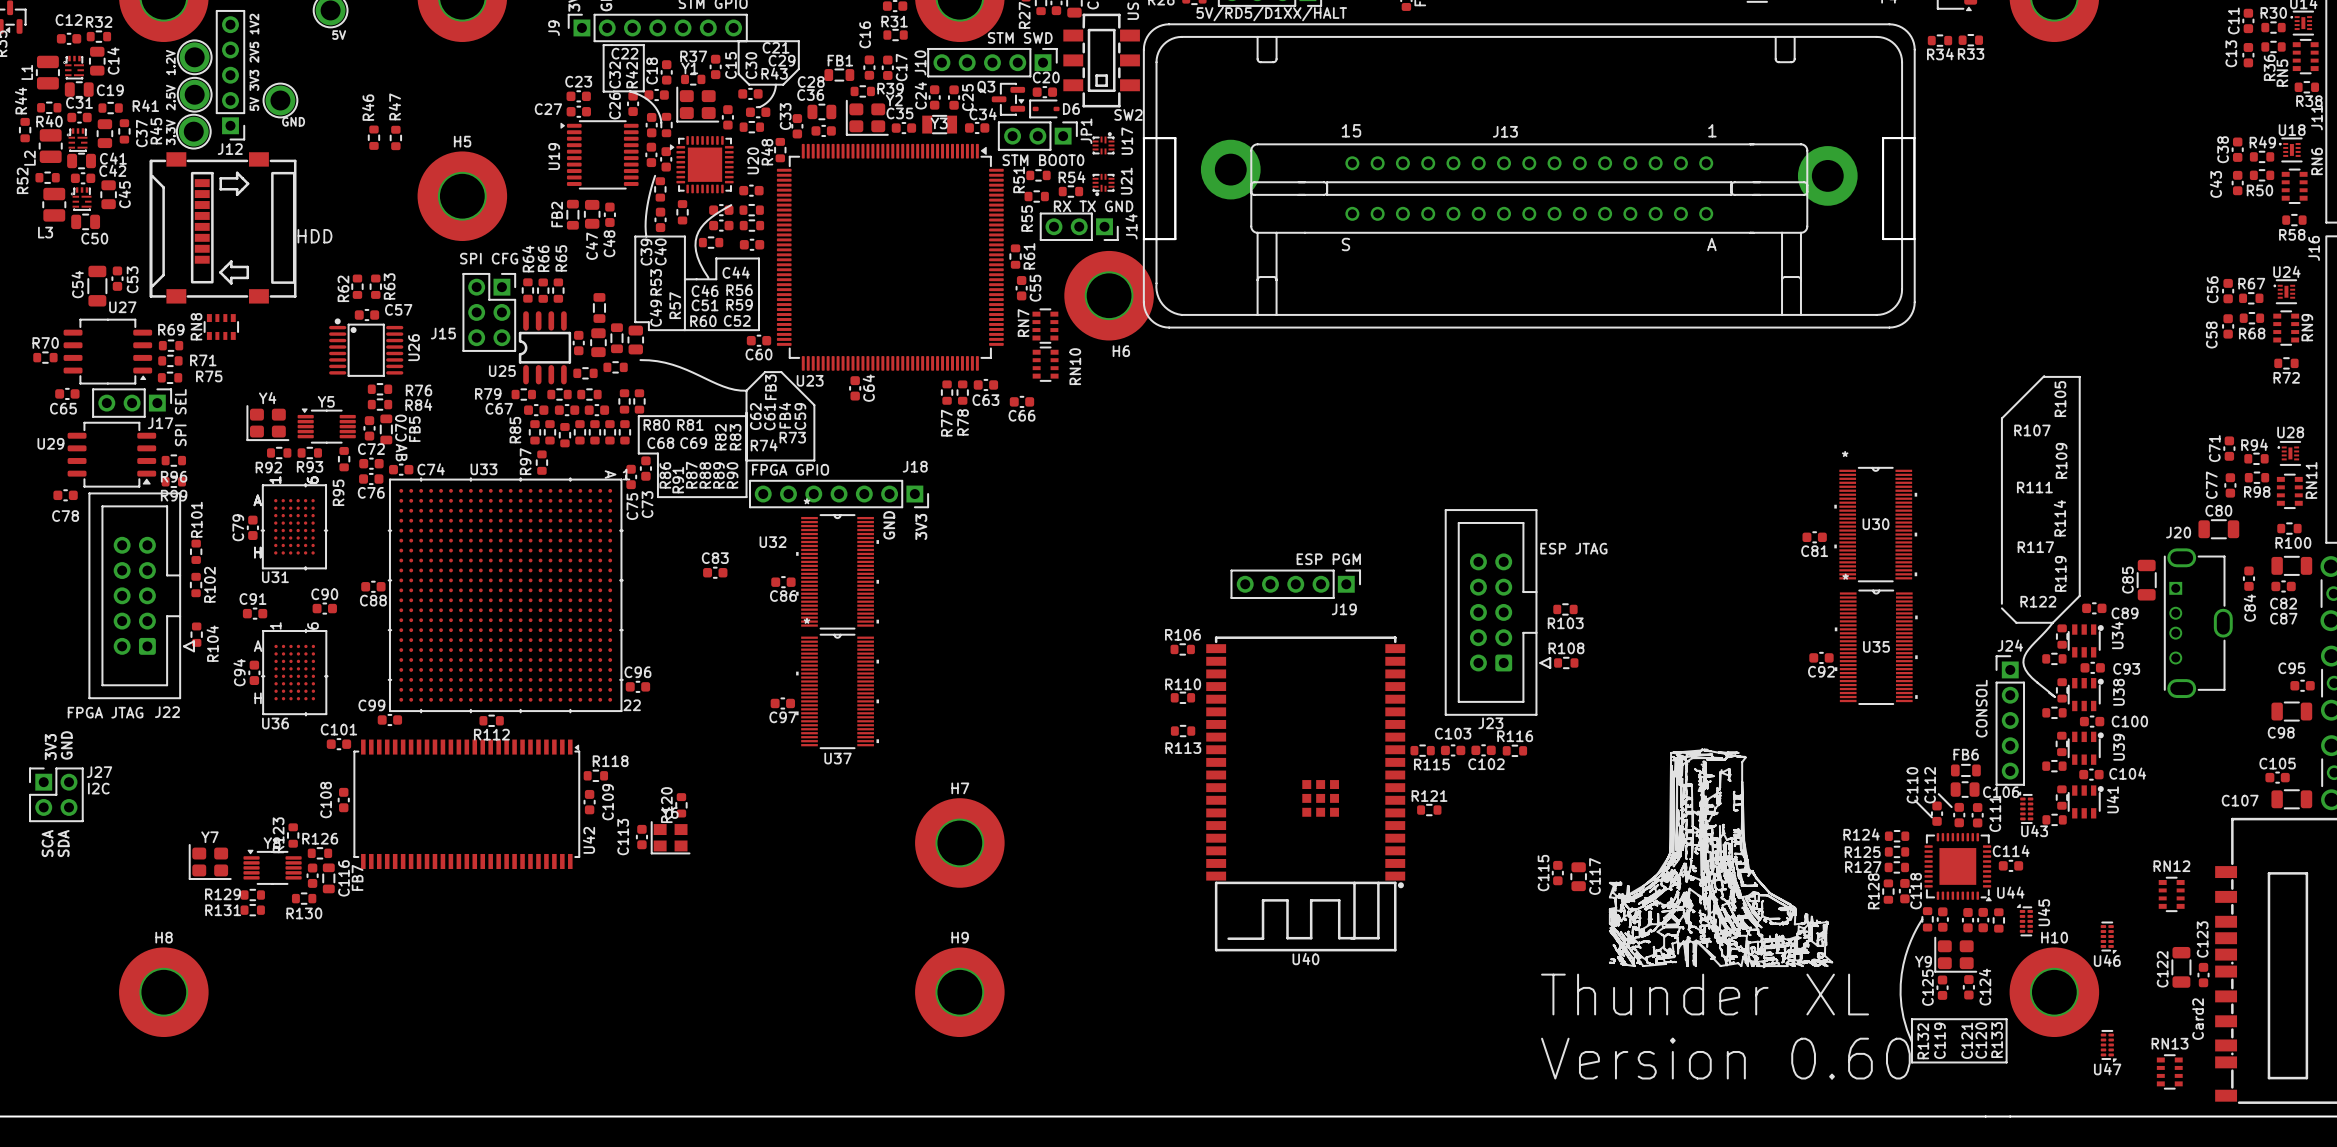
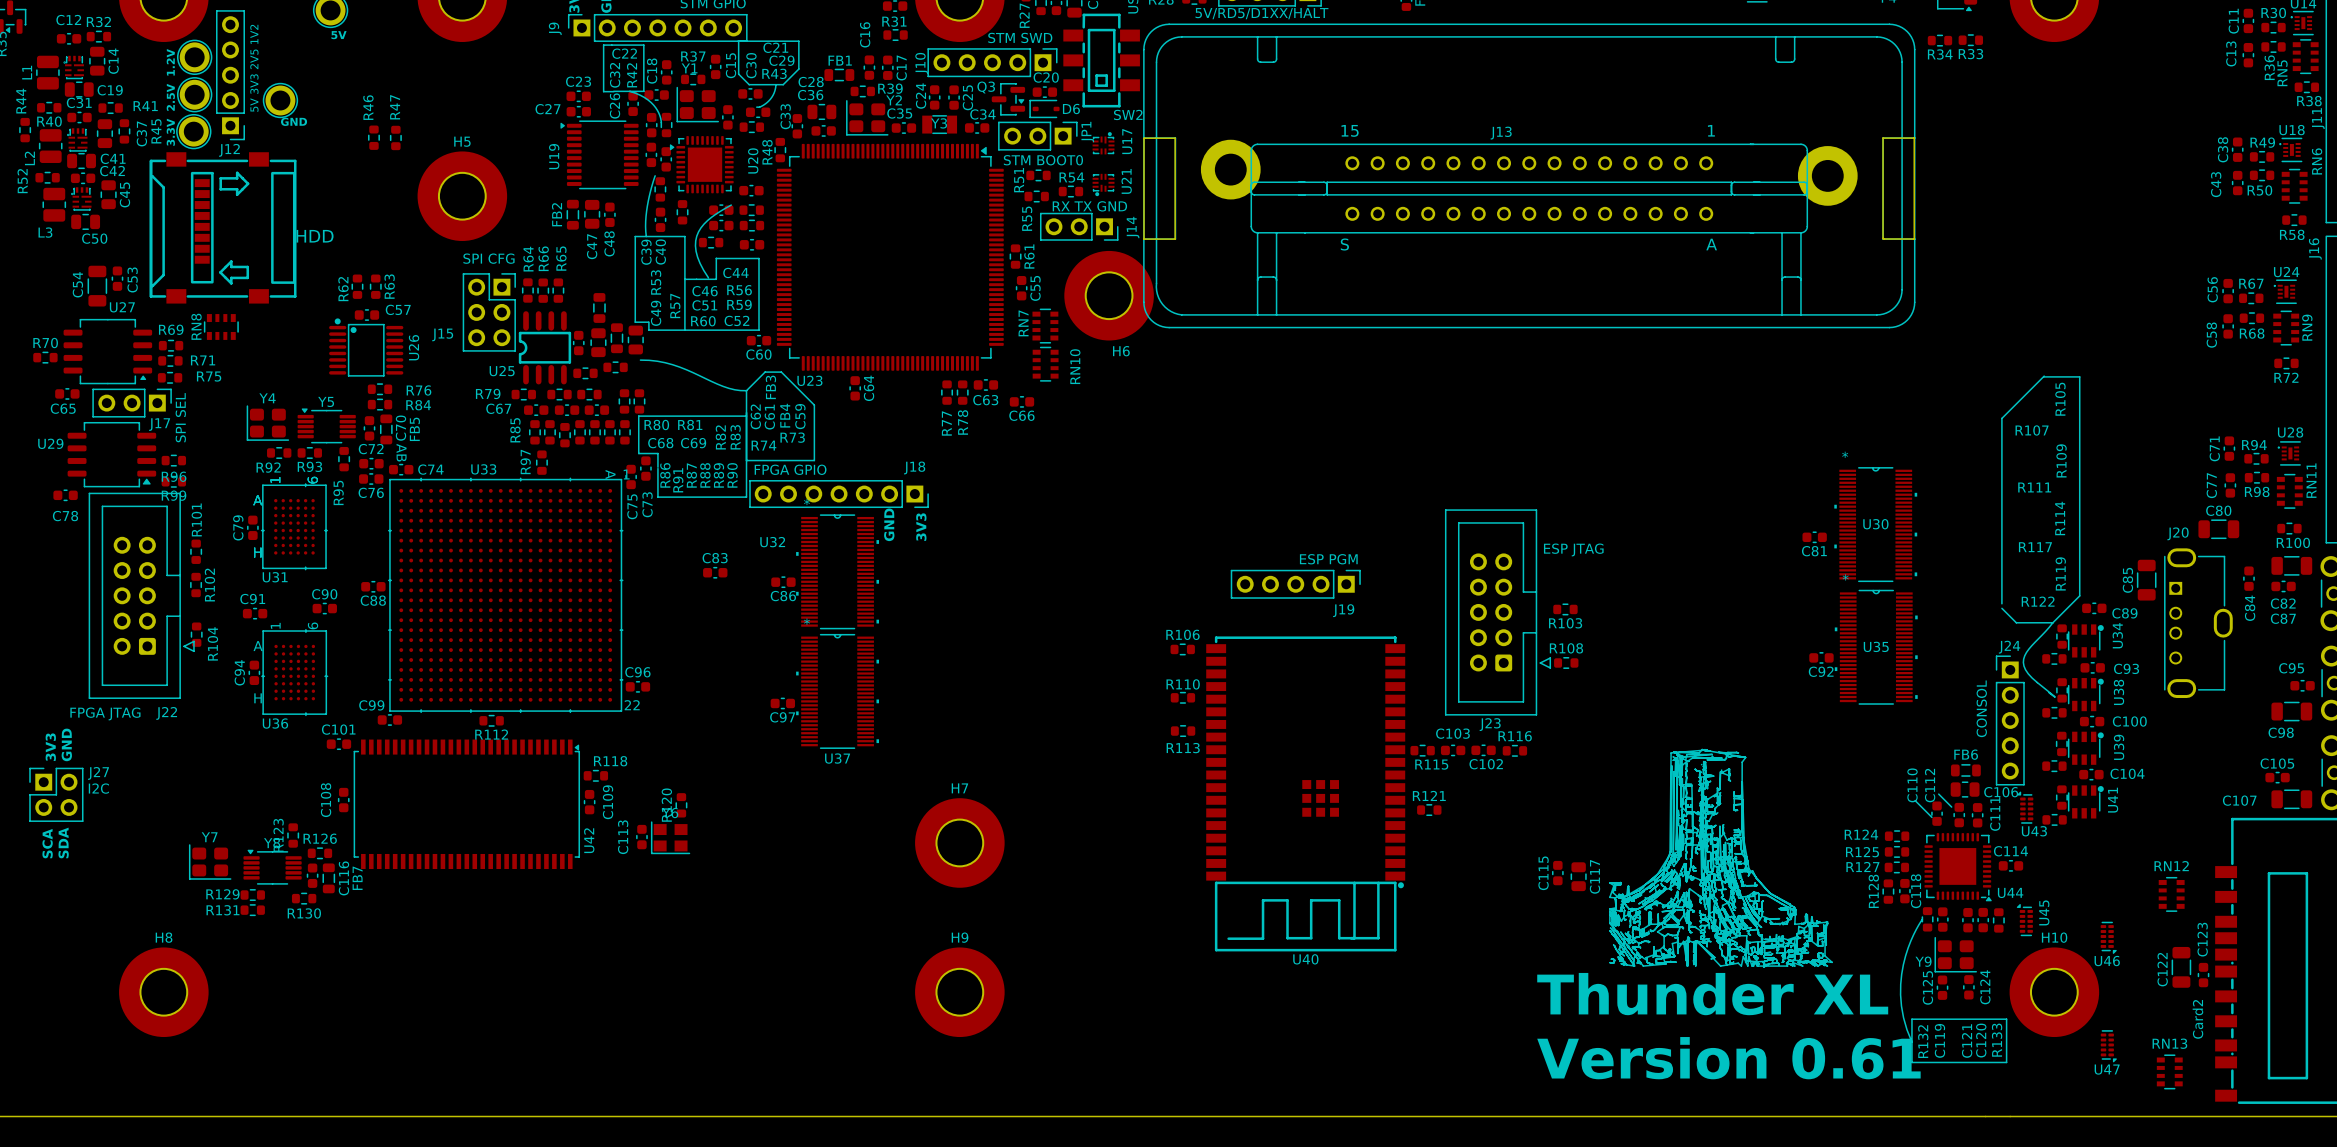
text: Version 0.60 (1725, 1058) -> Version 0.61 (1728, 1058)

